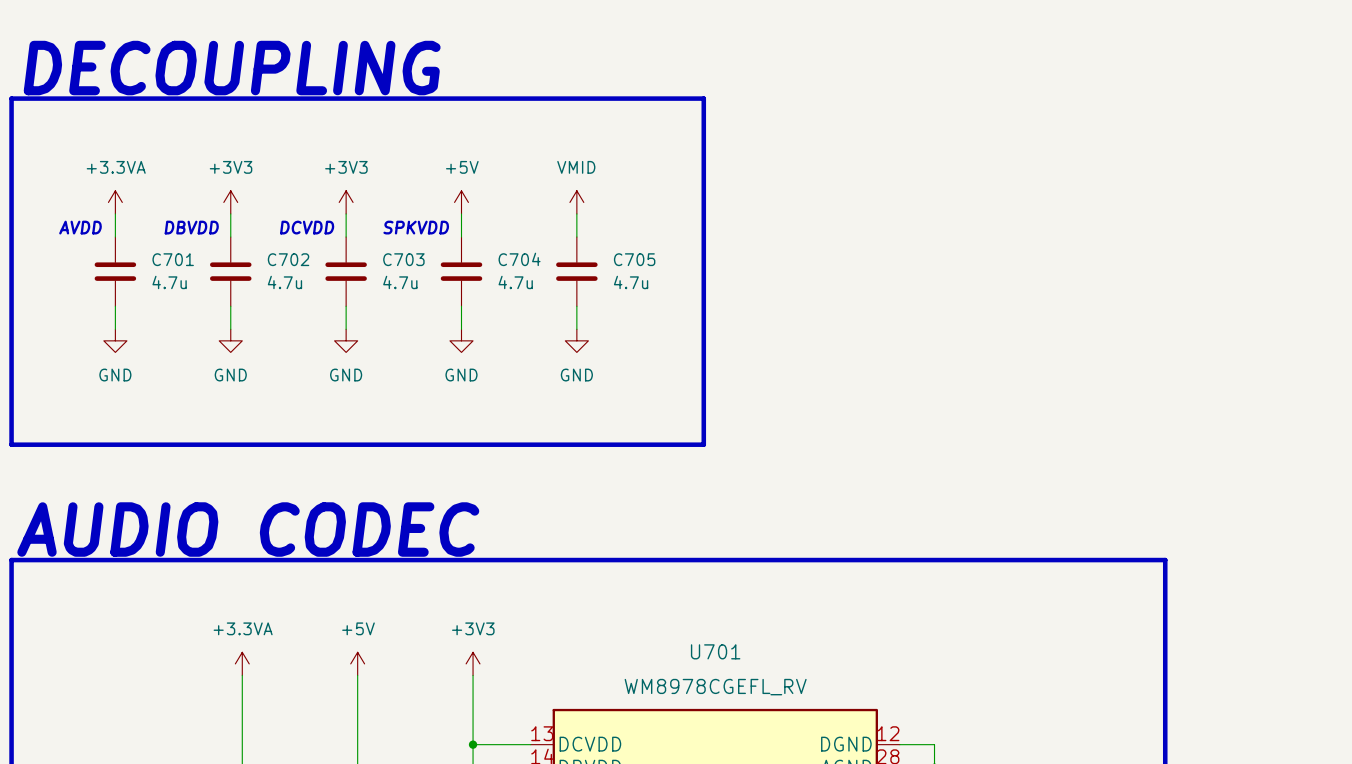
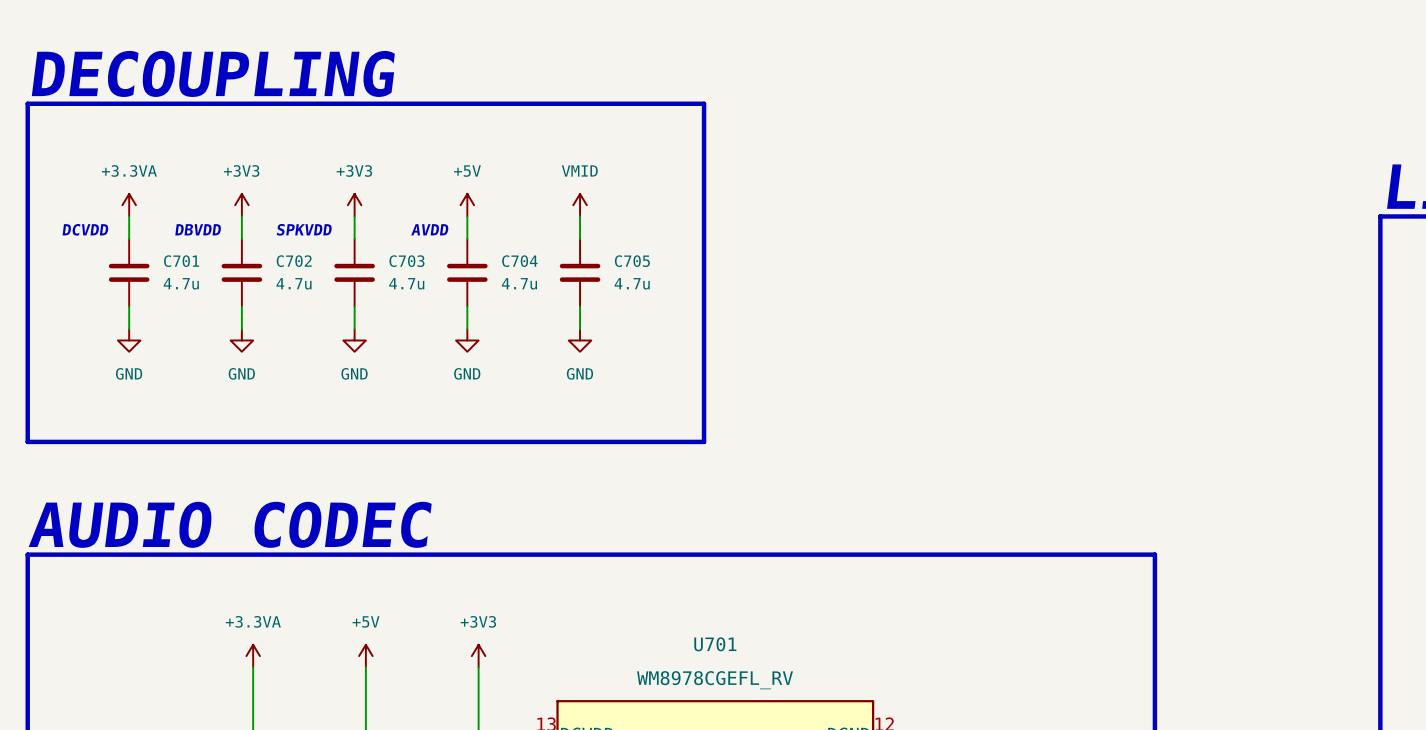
text: AVDD (80, 227) -> DCVDD (85, 229)
text: DCVDD (307, 227) -> none
text position: SPKVDD (416, 227) -> SPKVDD (304, 229)
text: none -> AVDD (429, 229)

